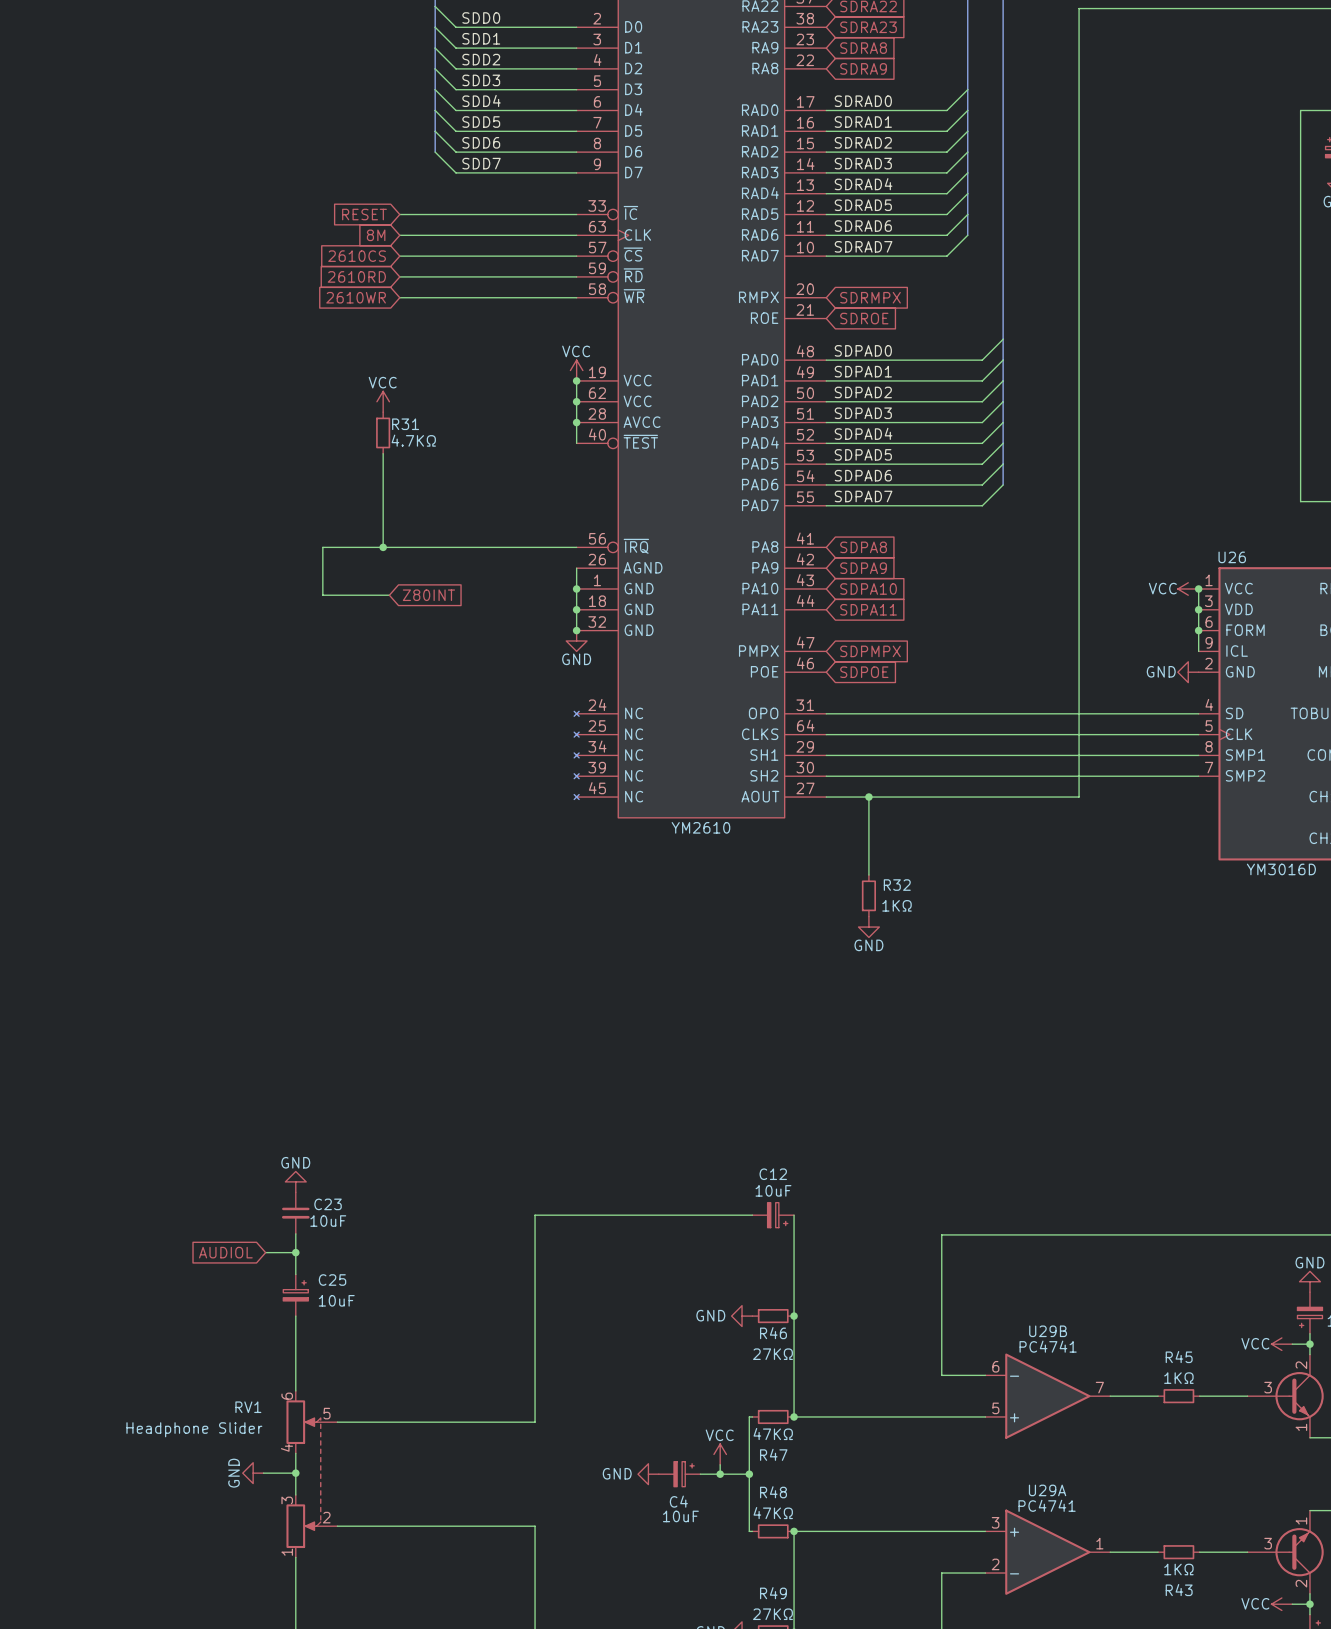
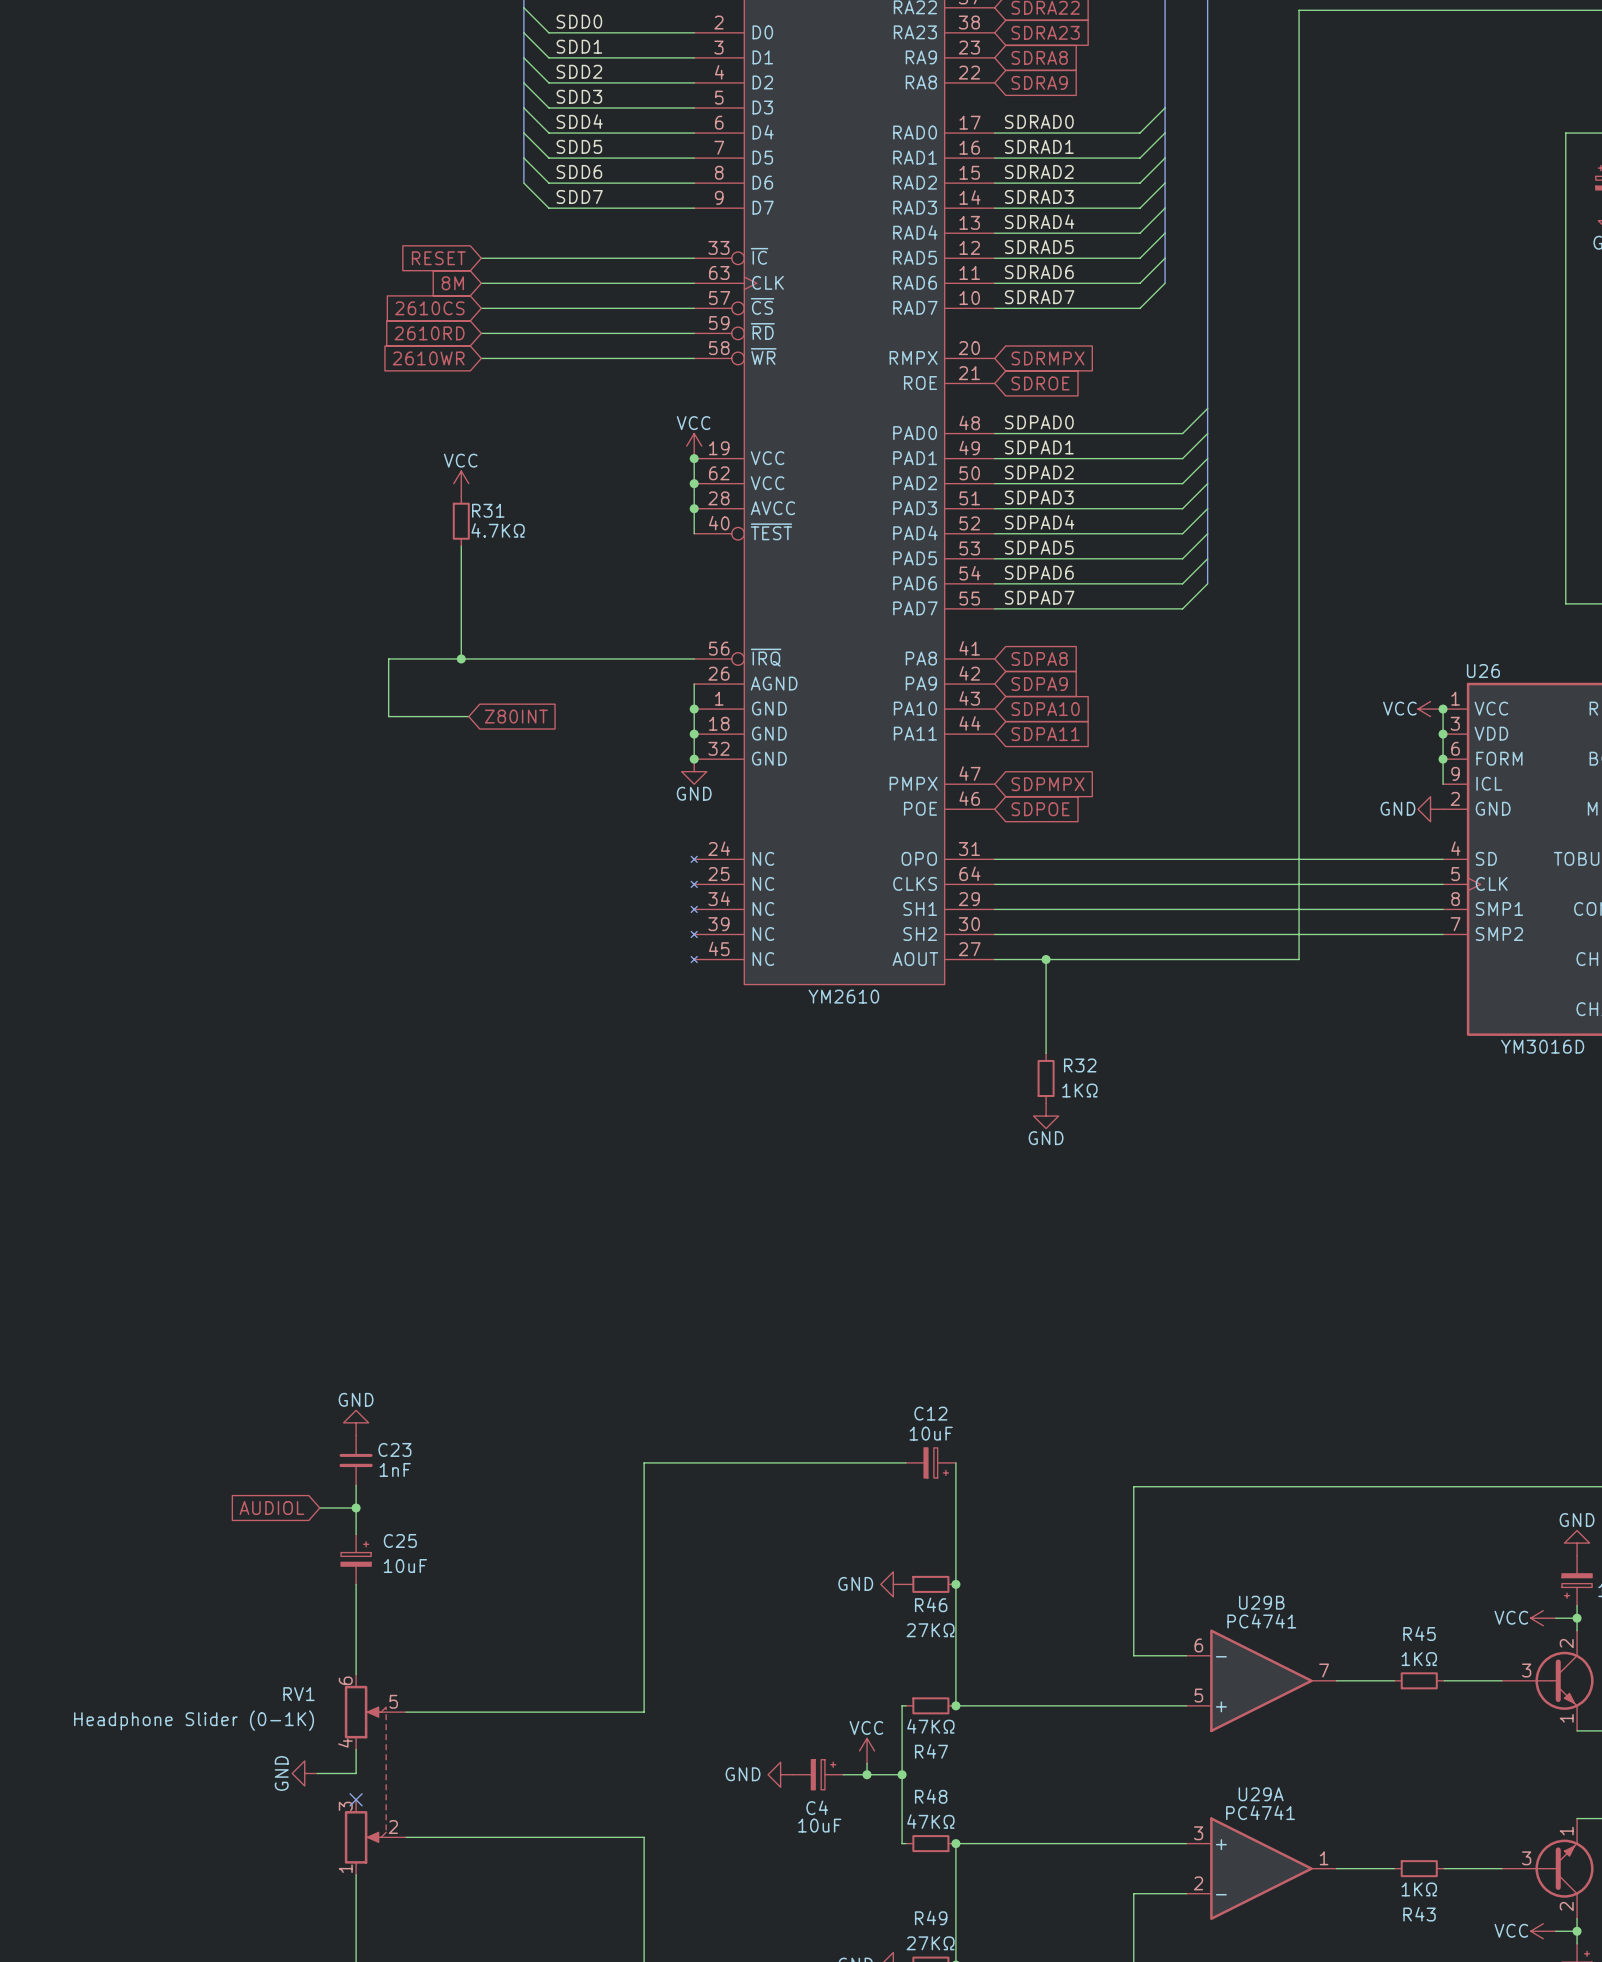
C23 value: 10uF (328, 1221) -> 1nF (395, 1469)
RV1 value: Headphone Slider (194, 1429) -> Headphone Slider (0-1K) (194, 1720)
wire: (295, 1473) (295, 1494) -> none
junction: (295, 1473) -> none
no-connect mark: none -> (356, 1799)

